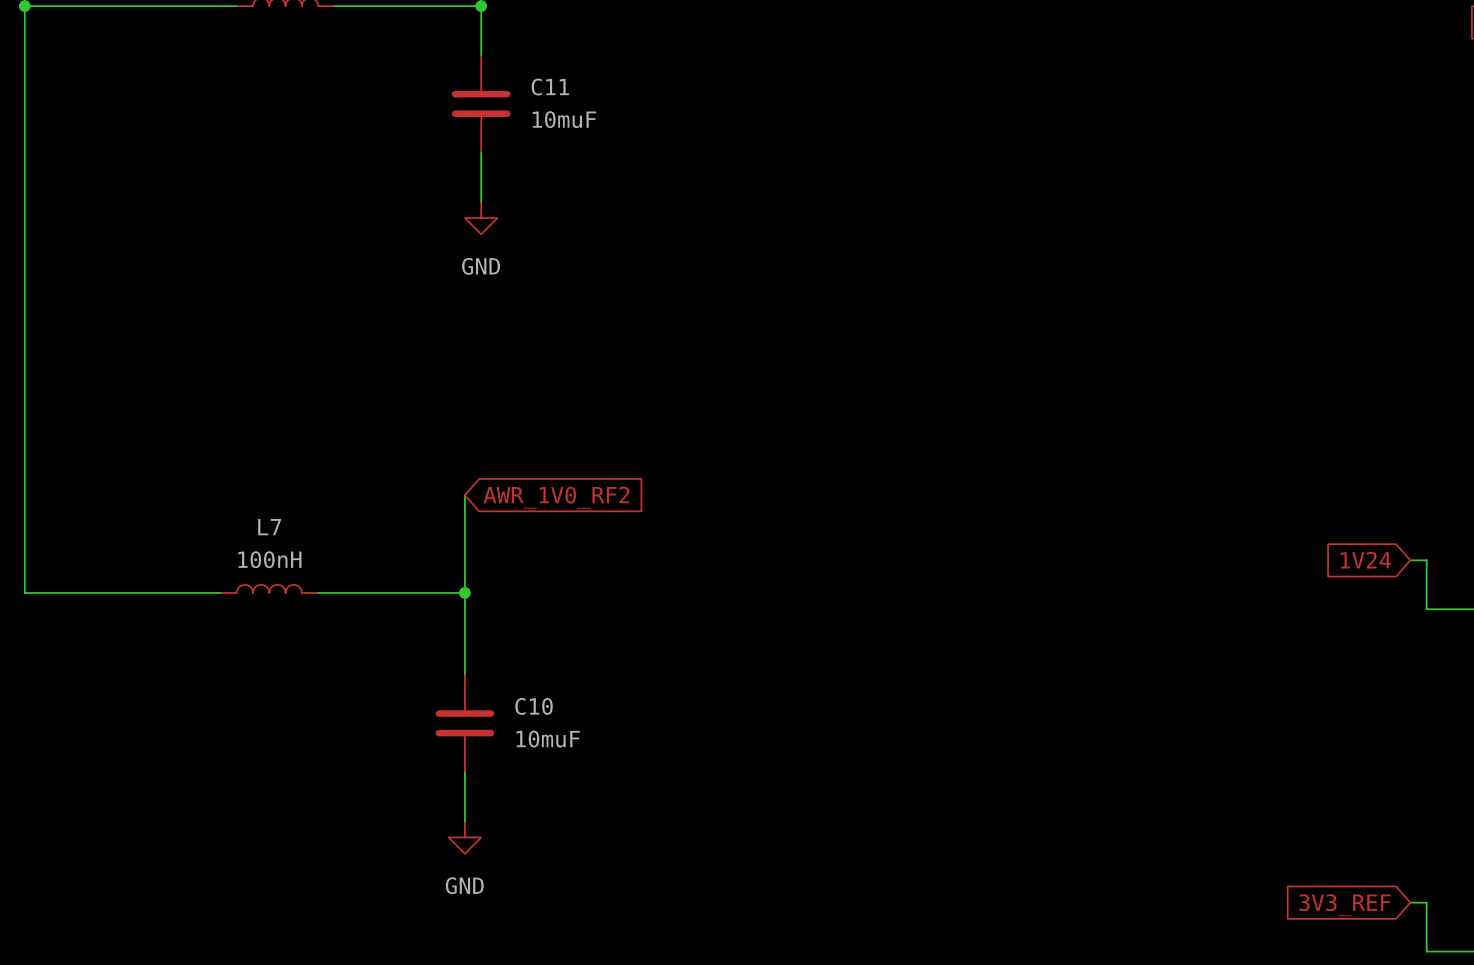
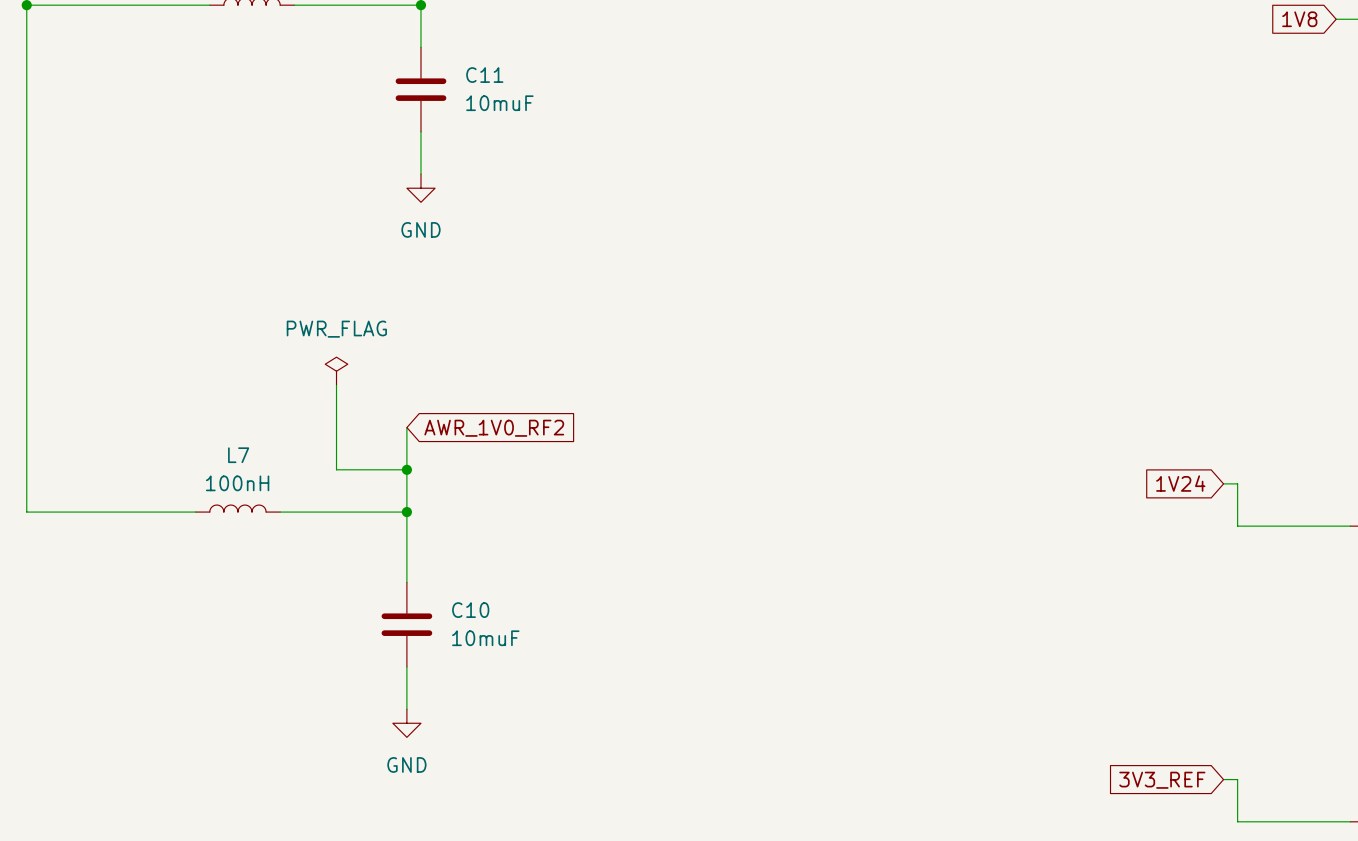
power symbol: none -> PWR_FLAG (336, 371)
wire: none -> (336, 385) (336, 469) (406, 469)
junction: none -> (406, 469)

